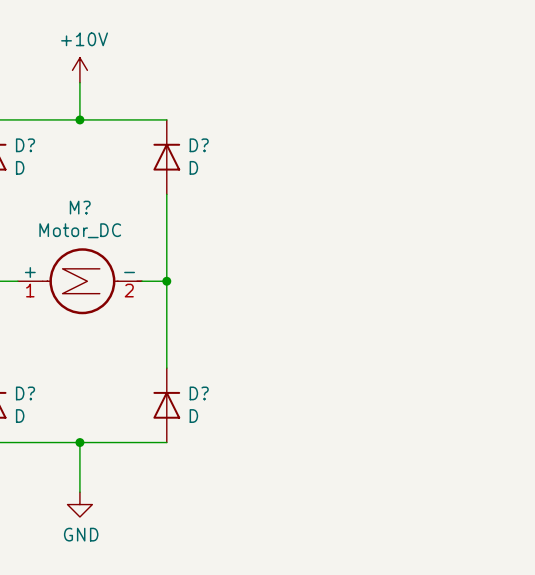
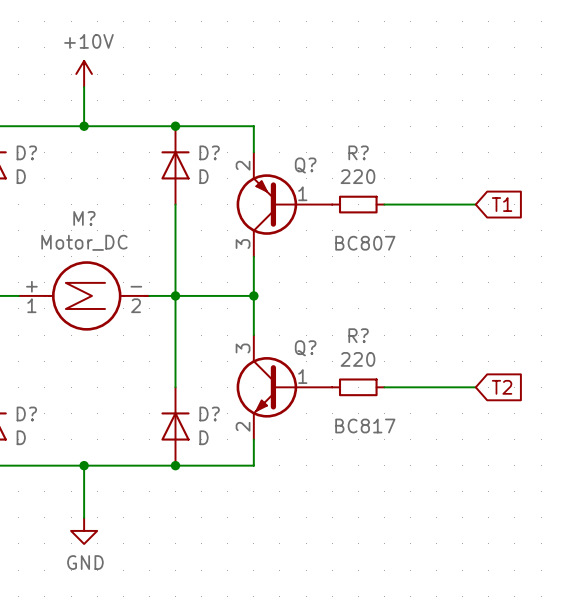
wire: none -> (175, 126) (253, 126) (253, 152)
junction: none -> (175, 126)
Q?: none -> BC807 (284, 204)
R?: none -> 220 (358, 204)
wire: none -> (384, 204) (475, 204)
global label: none -> T1 (502, 204)
wire: none -> (253, 256) (253, 335)
wire: none -> (175, 295) (253, 295)
junction: none -> (253, 295)
Q?: none -> BC817 (284, 387)
R?: none -> 220 (358, 387)
wire: none -> (384, 387) (475, 387)
global label: none -> T2 (502, 387)
wire: none -> (253, 439) (253, 465) (175, 465)
junction: none -> (175, 465)

